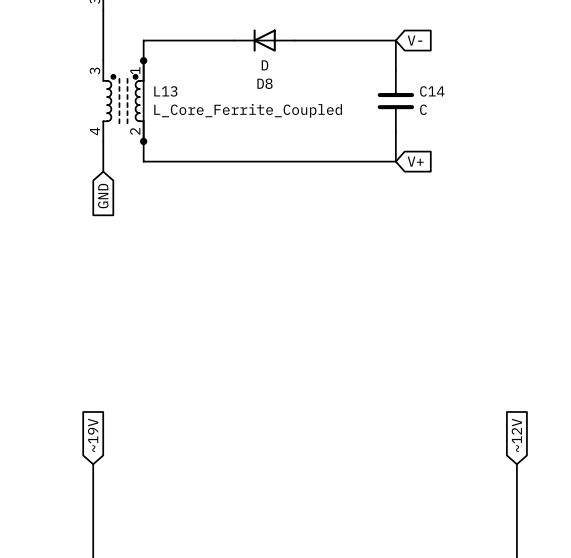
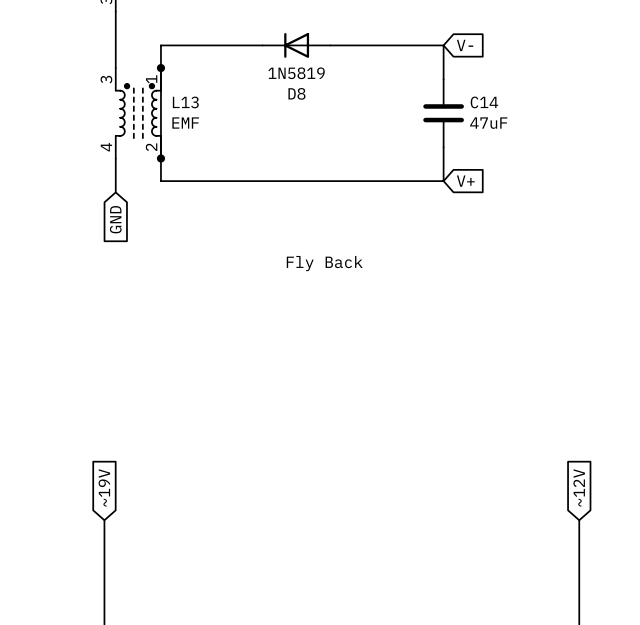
D8 value: D (264, 65) -> 1N5819 (296, 73)
C14 value: C (423, 109) -> 47uF (488, 123)
L13 value: L_Core_Ferrite_Coupled (248, 110) -> EMF (185, 123)
text: none -> Fly Back (324, 263)

